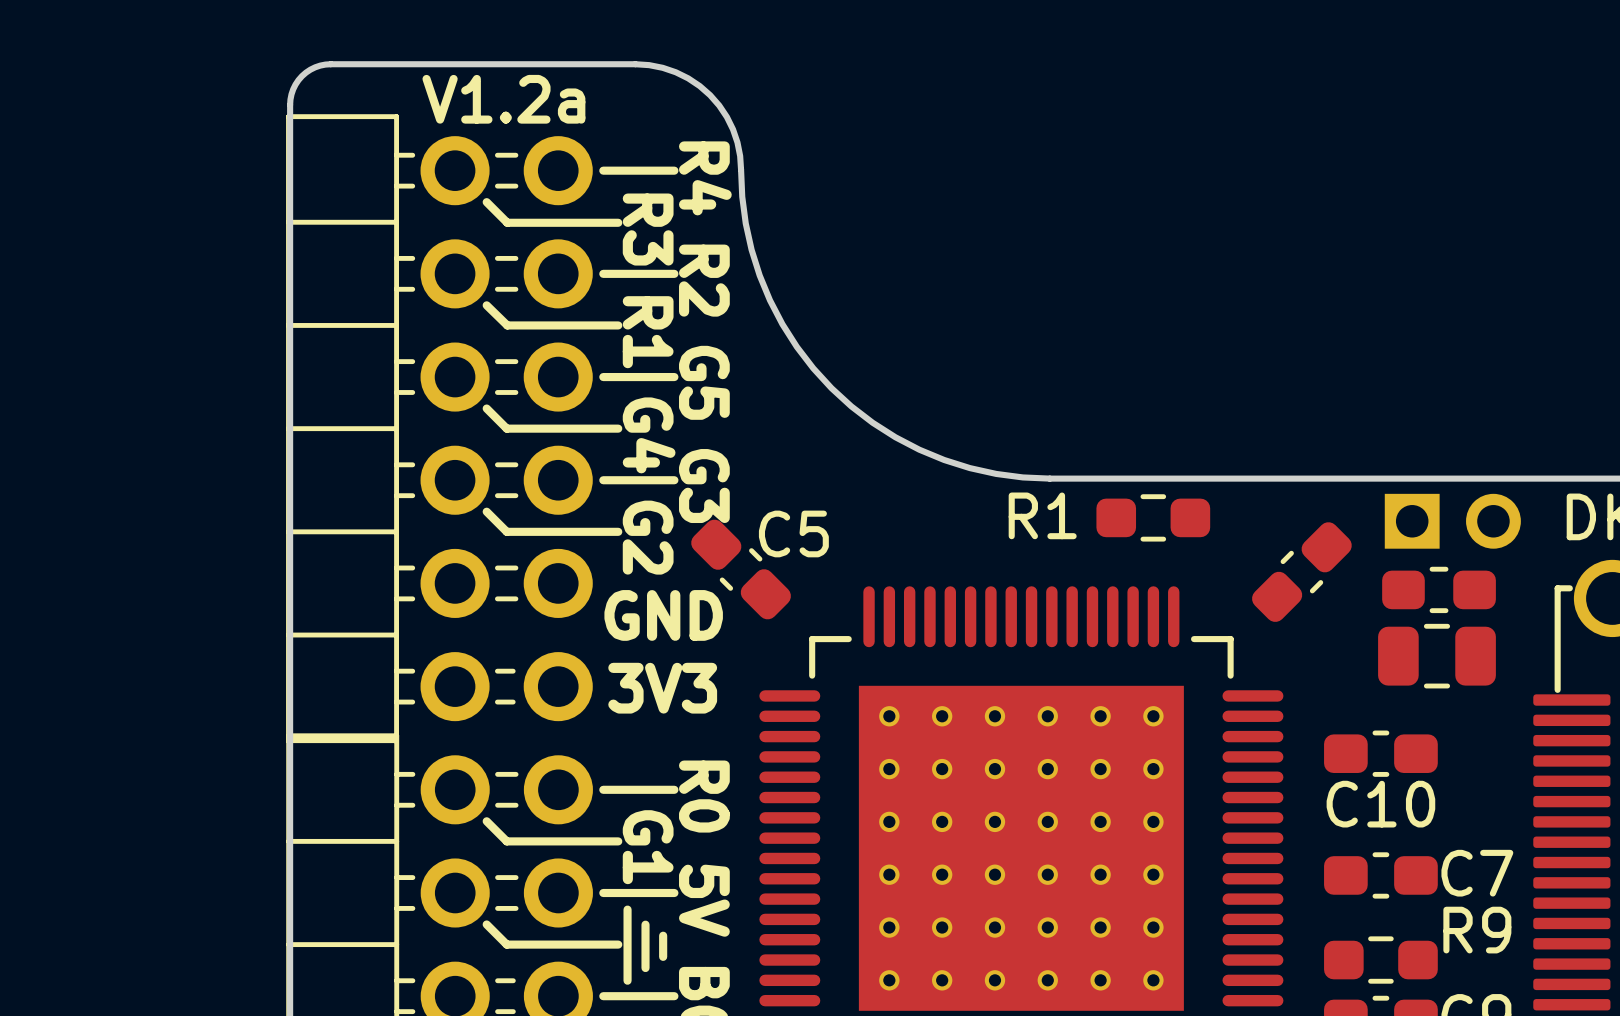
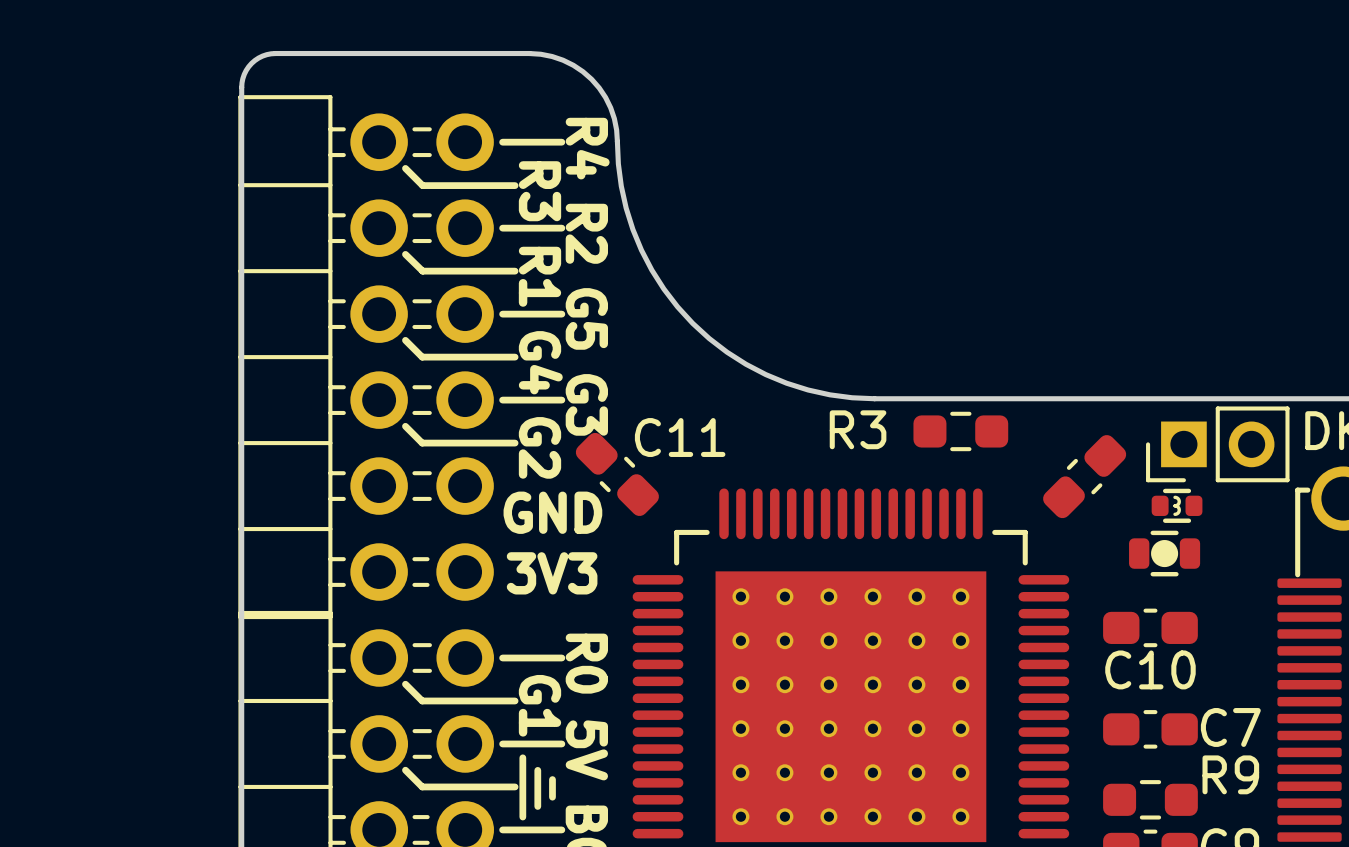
text: V1.2a (503, 99) -> none
part footprint: [1384, 493, 1521, 549] -> [1146, 406, 1290, 483]
text: R1 (1042, 515) -> R3 (858, 429)
text: C5 (793, 533) -> C11 (680, 437)
part: (1439, 589) -> none
part: none -> (1177, 505)
part: (1436, 656) -> none
part: none -> (1164, 553)

